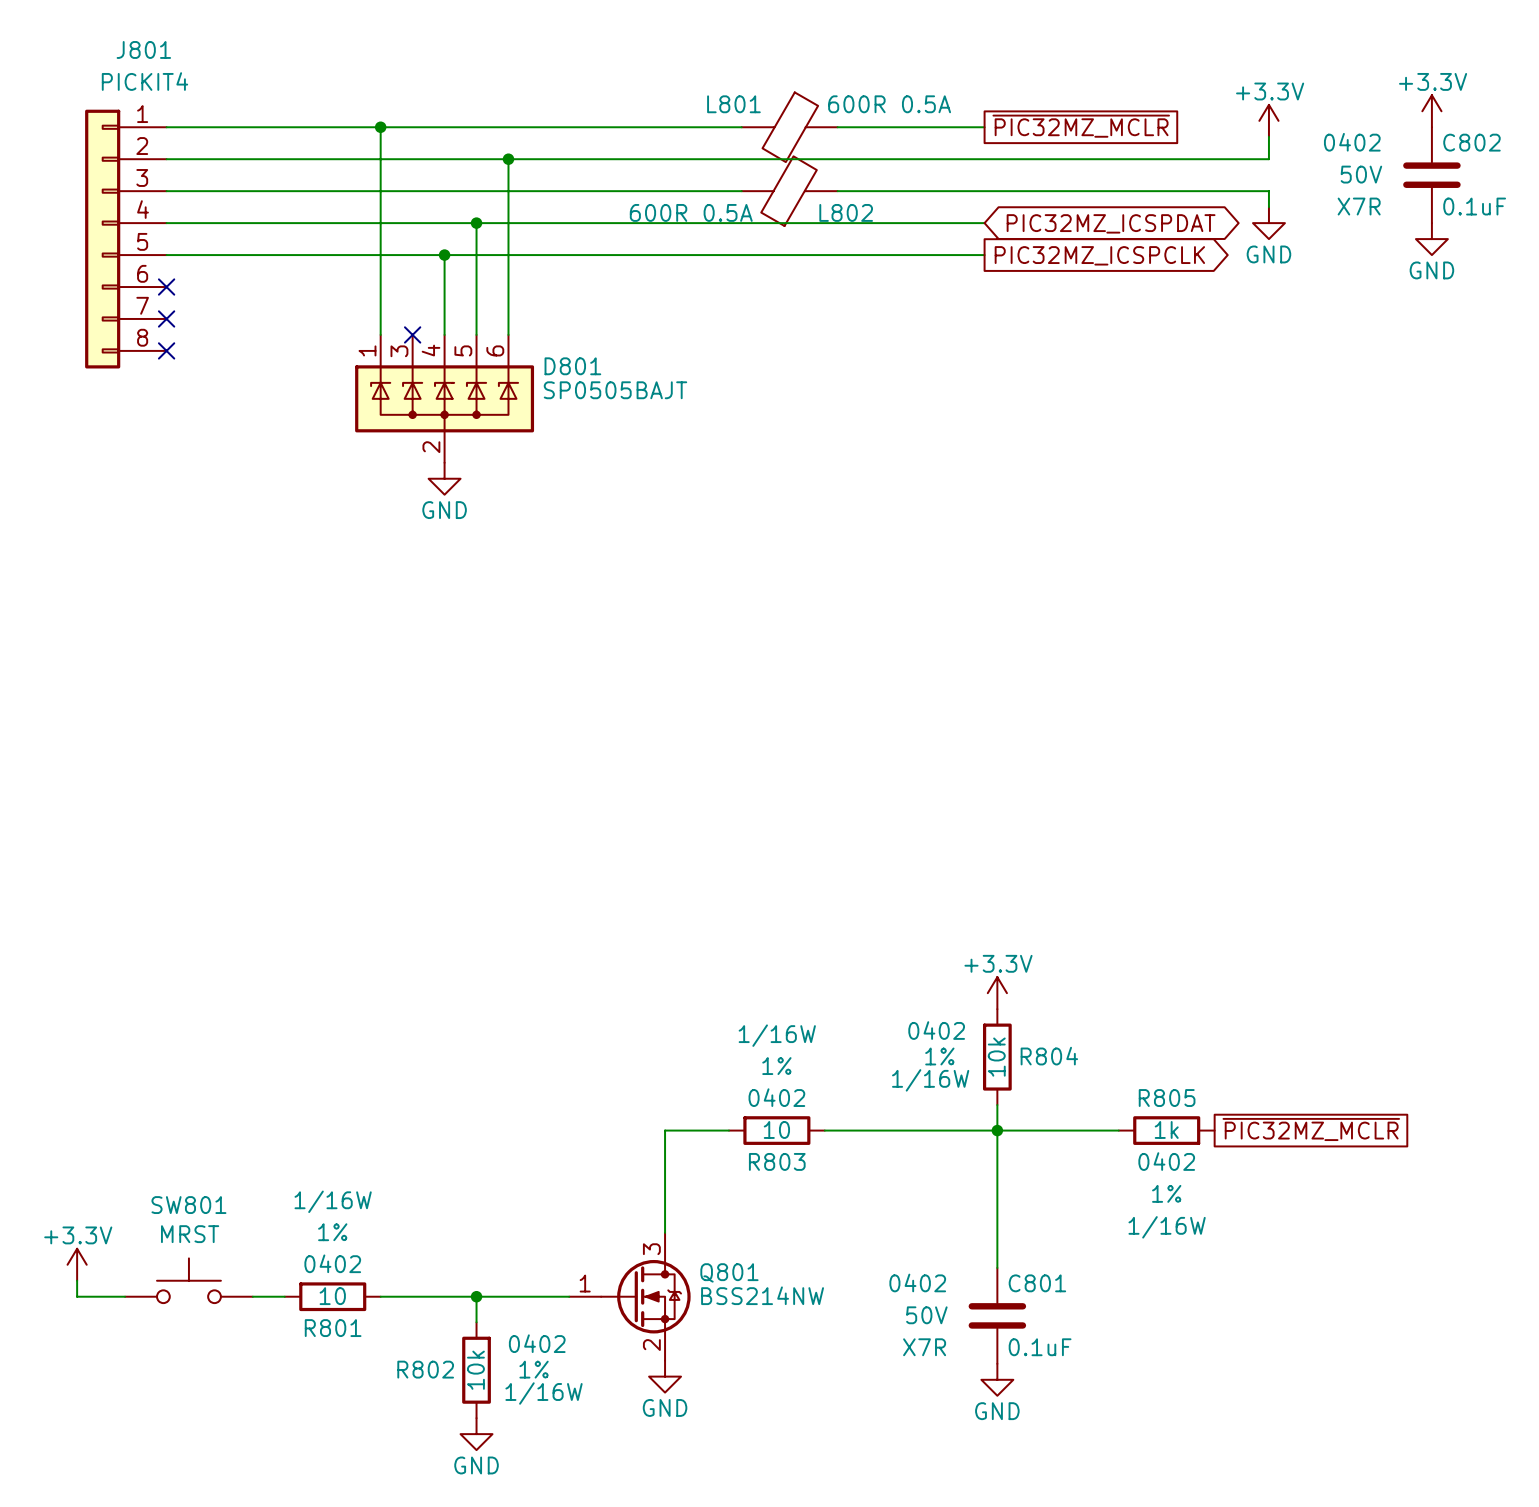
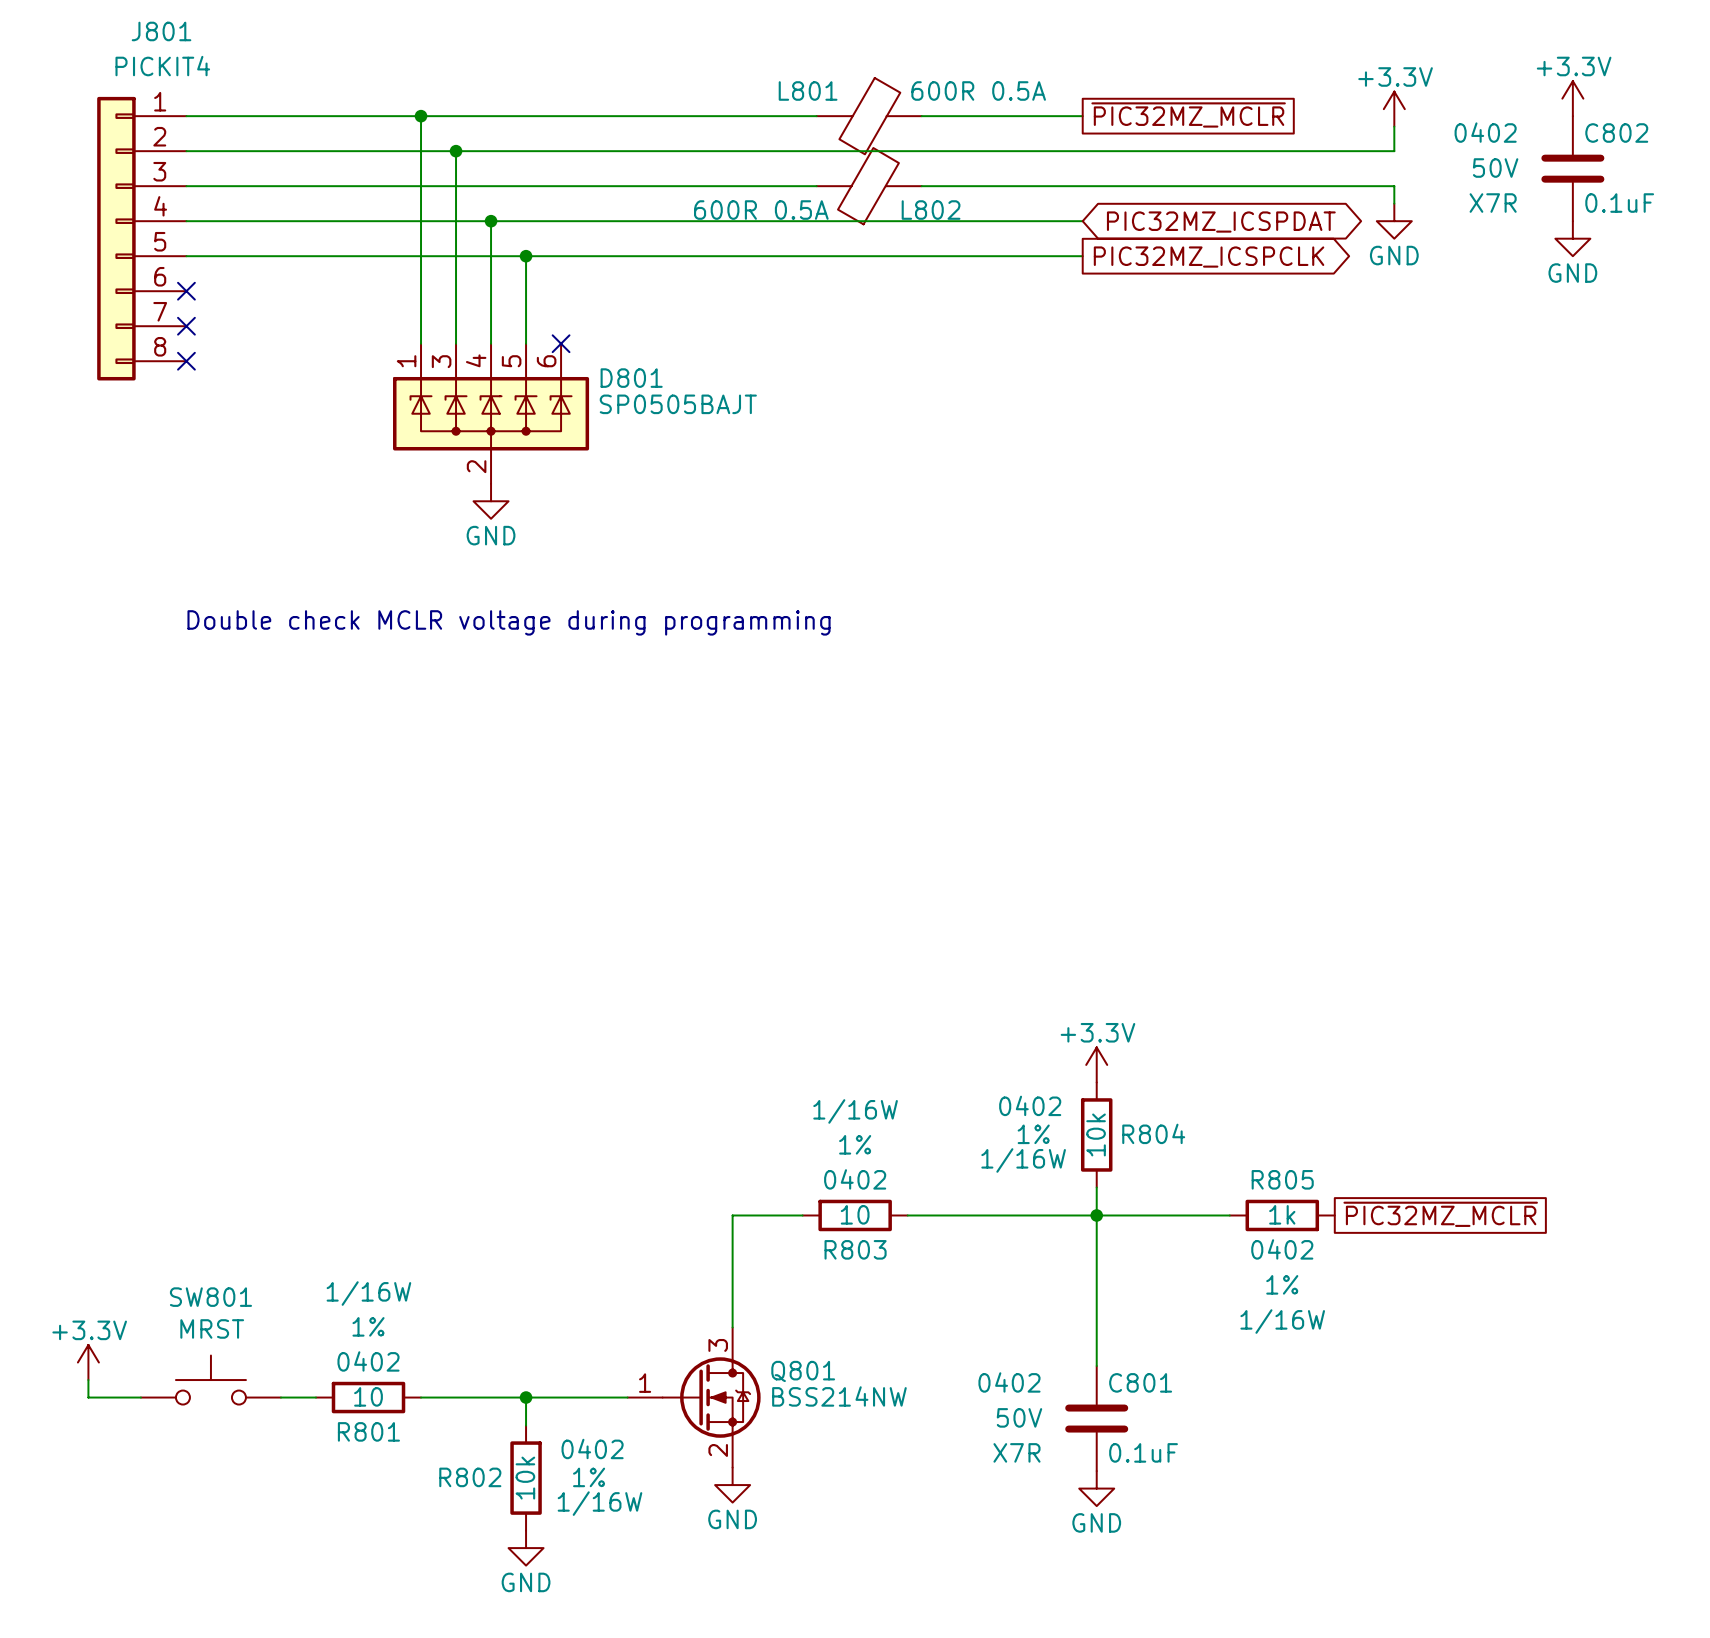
junction: none -> (456, 151)
wire: (508, 159) (508, 334) -> (456, 151) (456, 343)
junction: (508, 159) -> none
junction: none -> (491, 221)
wire: (476, 223) (476, 255) -> (491, 221) (491, 256)
junction: (476, 223) -> none
junction: (444, 255) -> none
junction: none -> (526, 256)
no-connect mark: (412, 334) -> none
no-connect mark: none -> (561, 343)
text: none -> Double check MCLR voltage during programming (509, 622)

